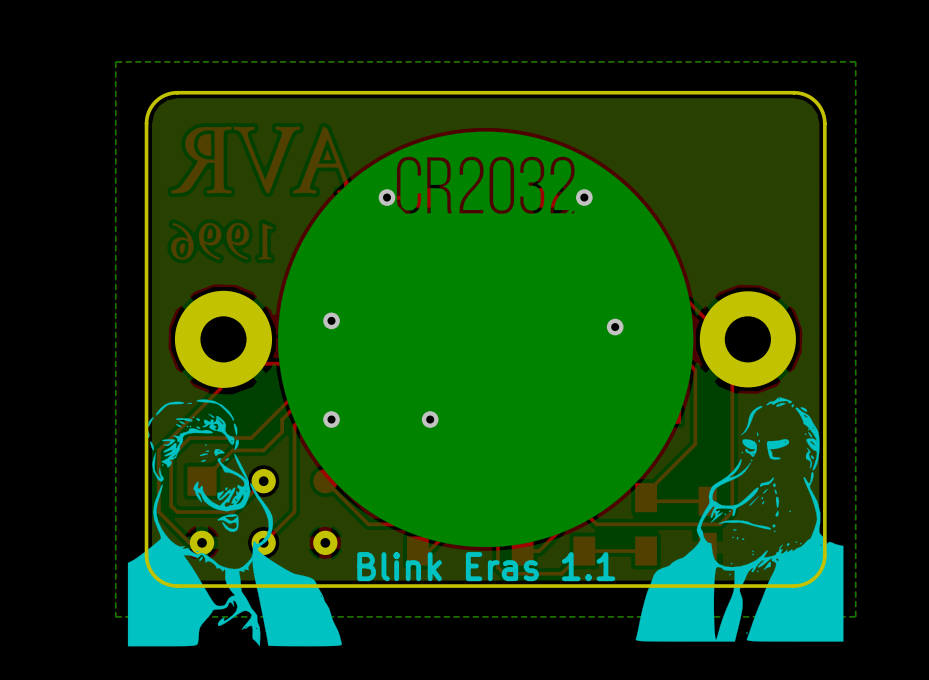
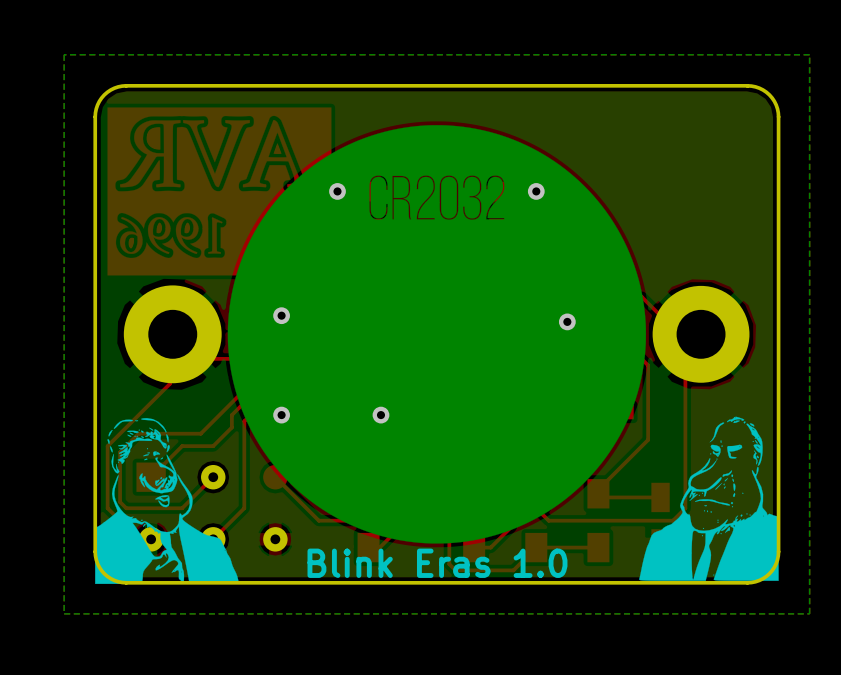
drawing: none -> [107, 107, 332, 276]
part footprint: [174, 131, 796, 548] -> [123, 125, 750, 544]
drawing shape: [635, 397, 844, 642] -> [639, 416, 779, 581]
drawing: [127, 399, 342, 647] -> none
drawing: none -> [95, 418, 239, 585]
text: Blink Eras 1.1 (486, 566) -> Blink Eras 1.0 (437, 563)

